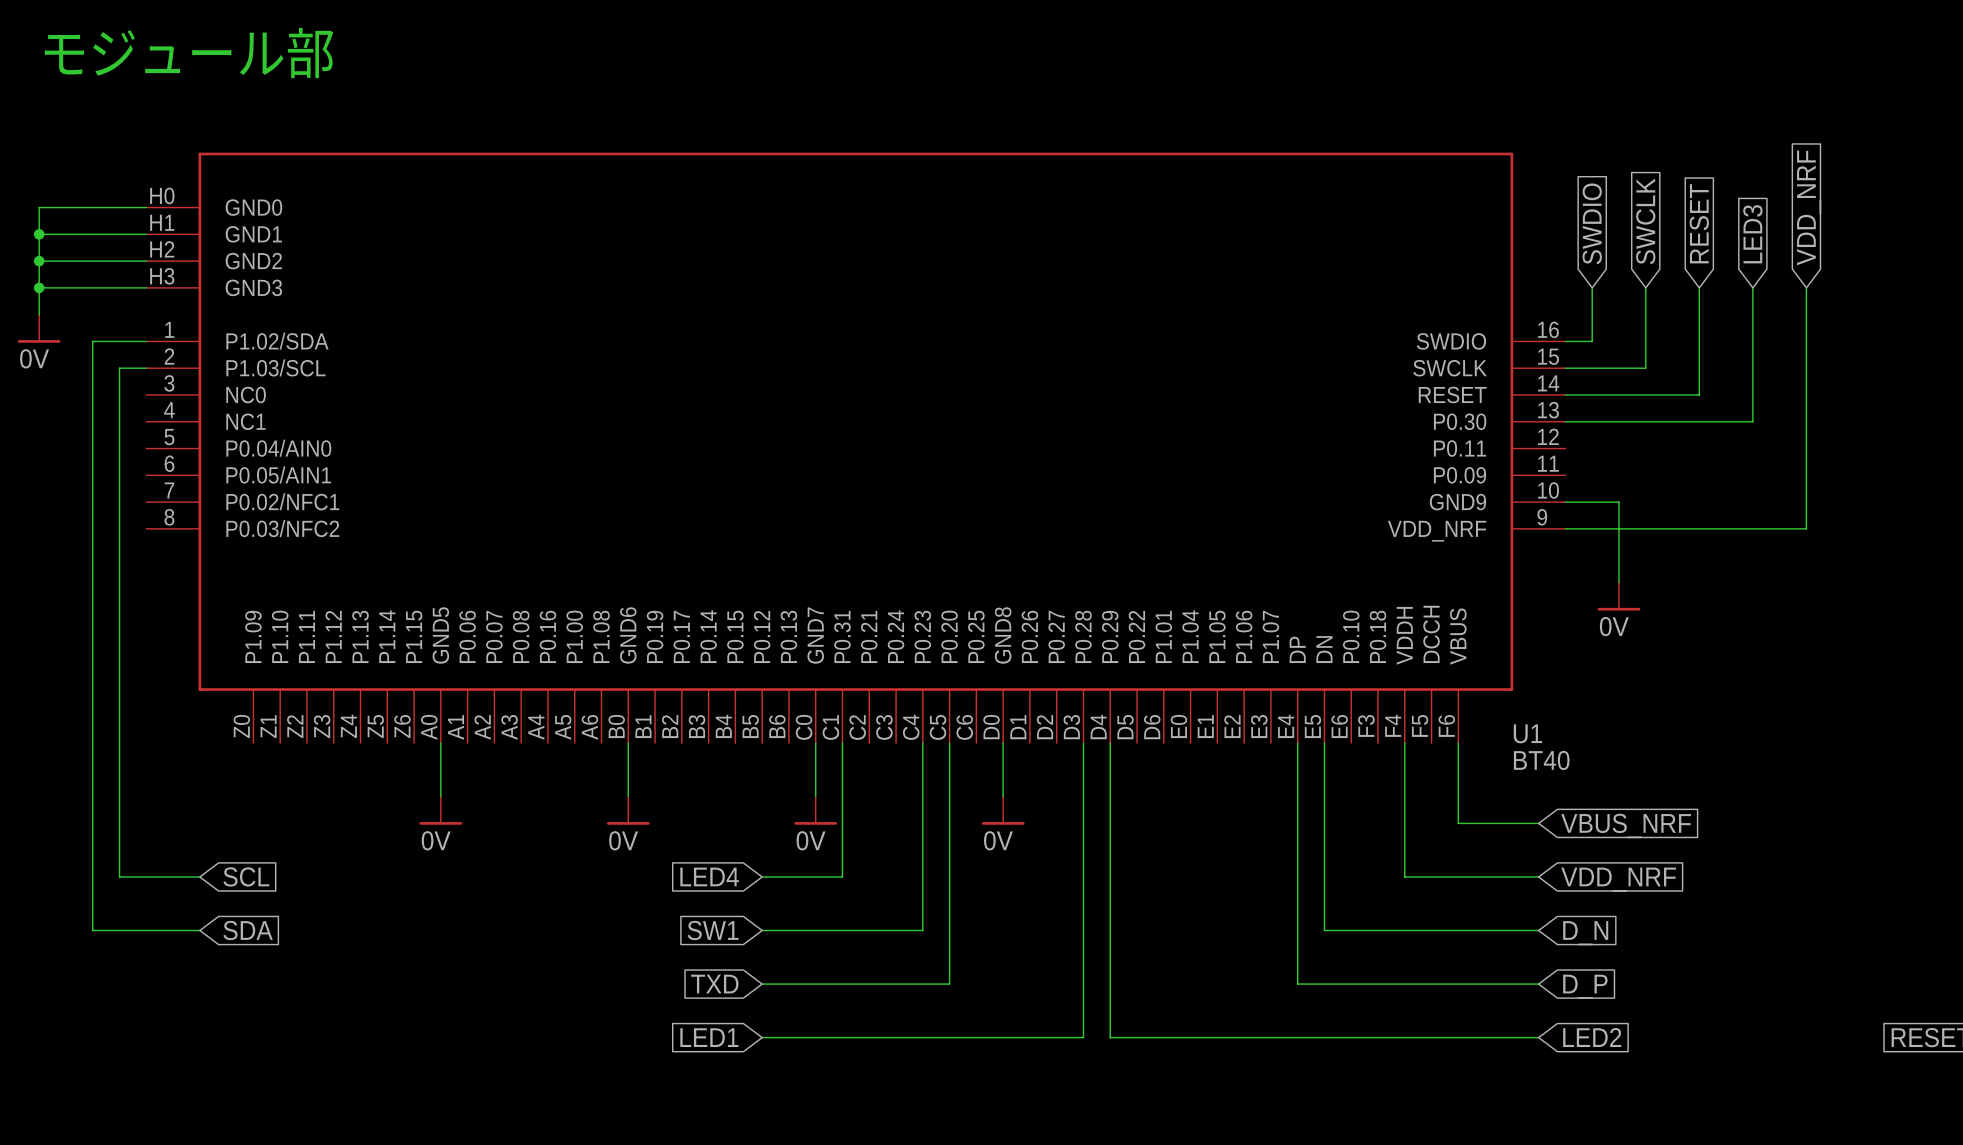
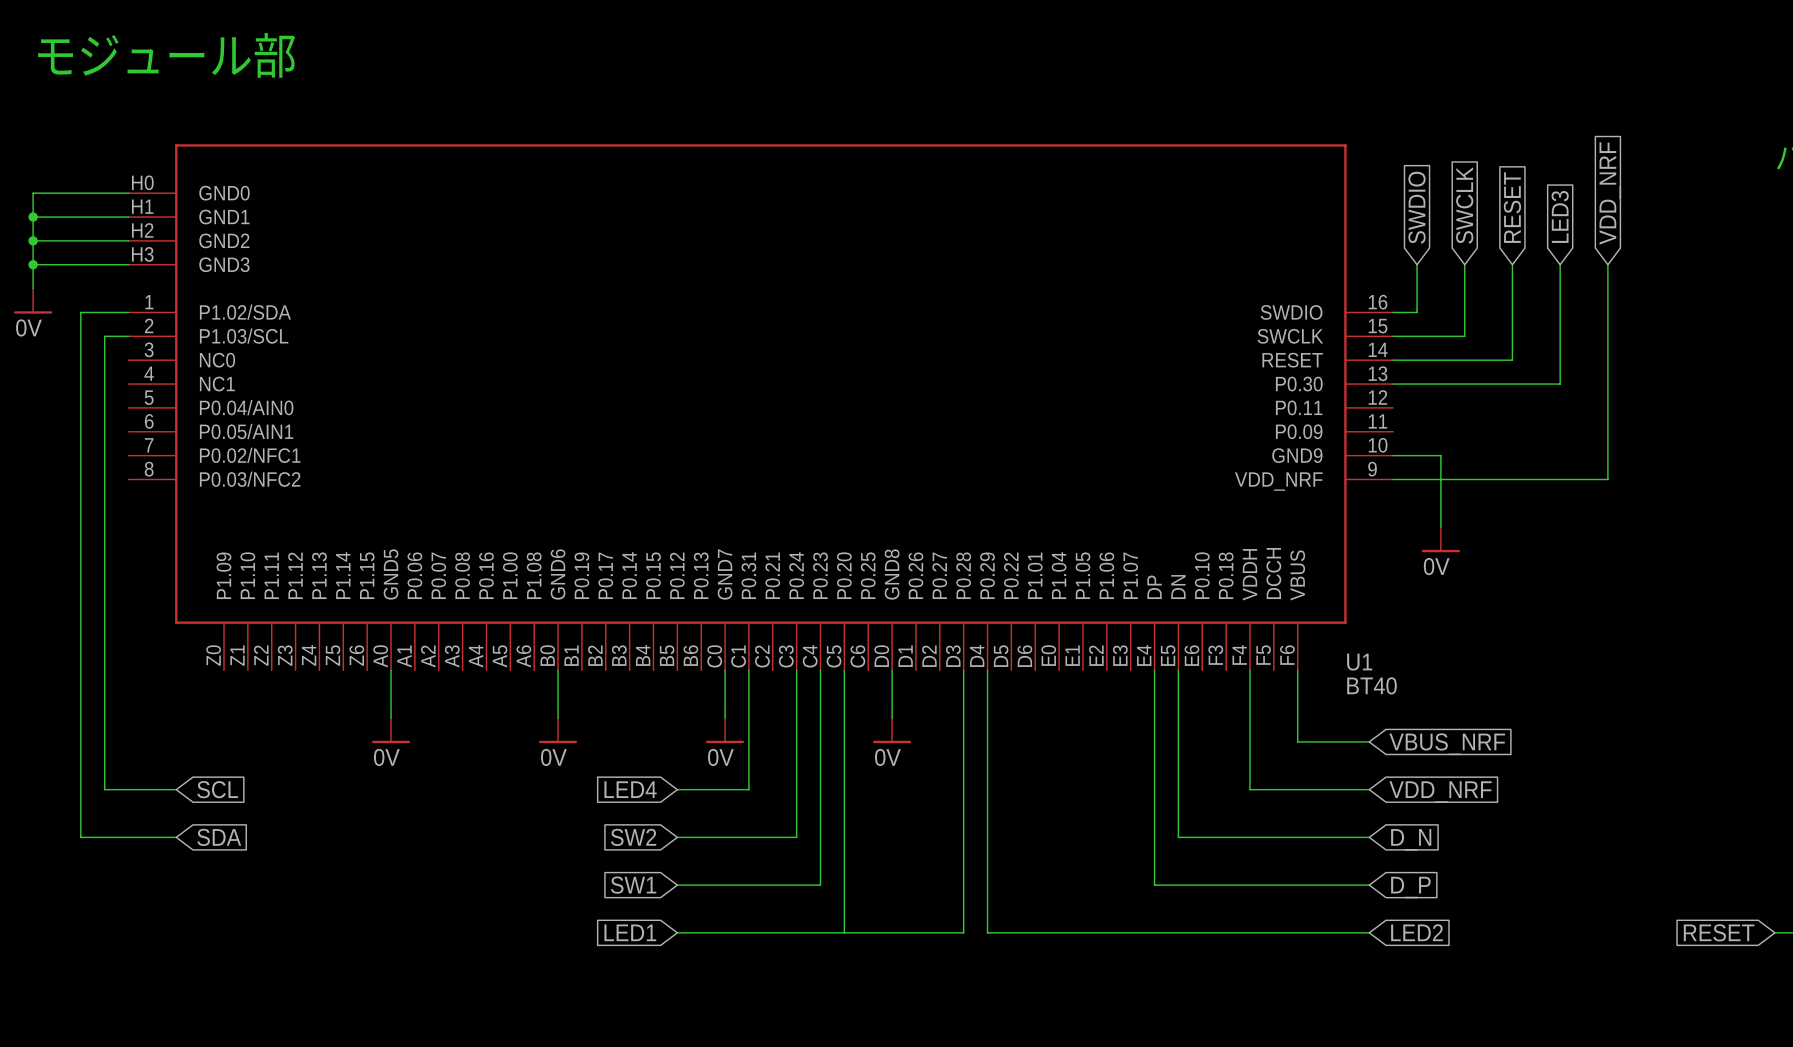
wire: none -> (796, 670) (796, 837)
global label: SW1 (713, 930) -> SW2 (633, 837)
wire: (896, 930) (922, 930) -> (820, 885) (820, 837)
global label: TXD (714, 984) -> SW1 (633, 885)
wire: (922, 984) (949, 984) -> (844, 932) (844, 885)

